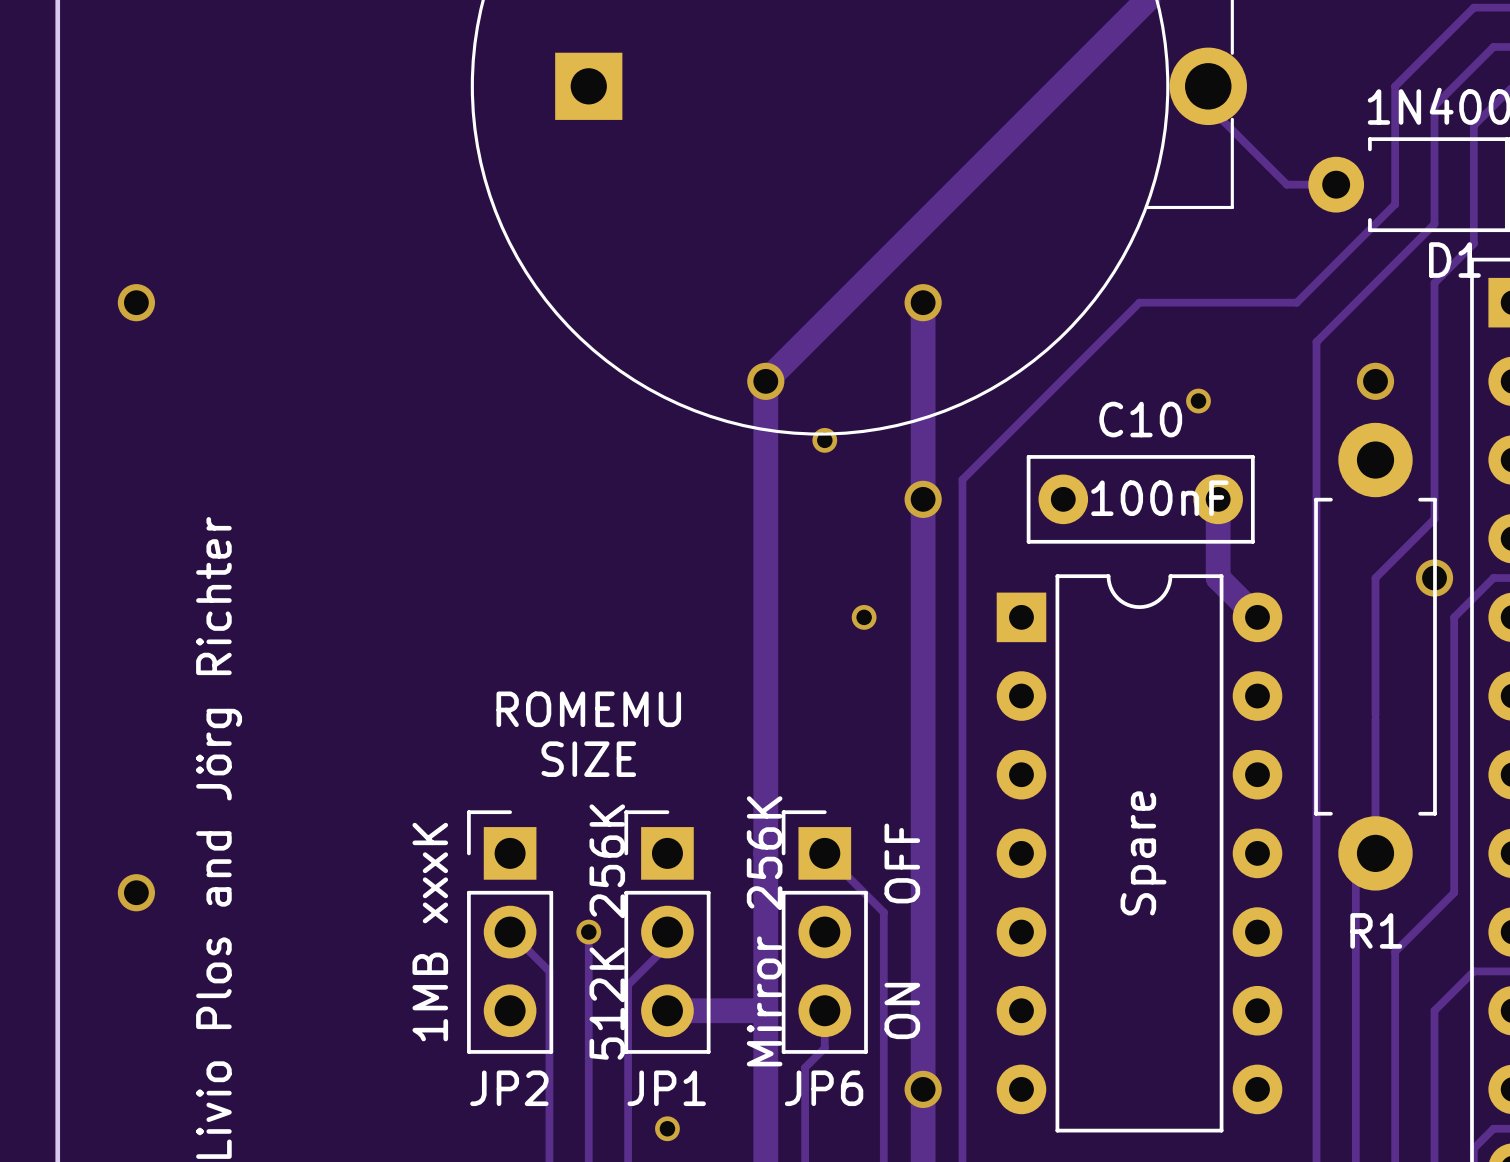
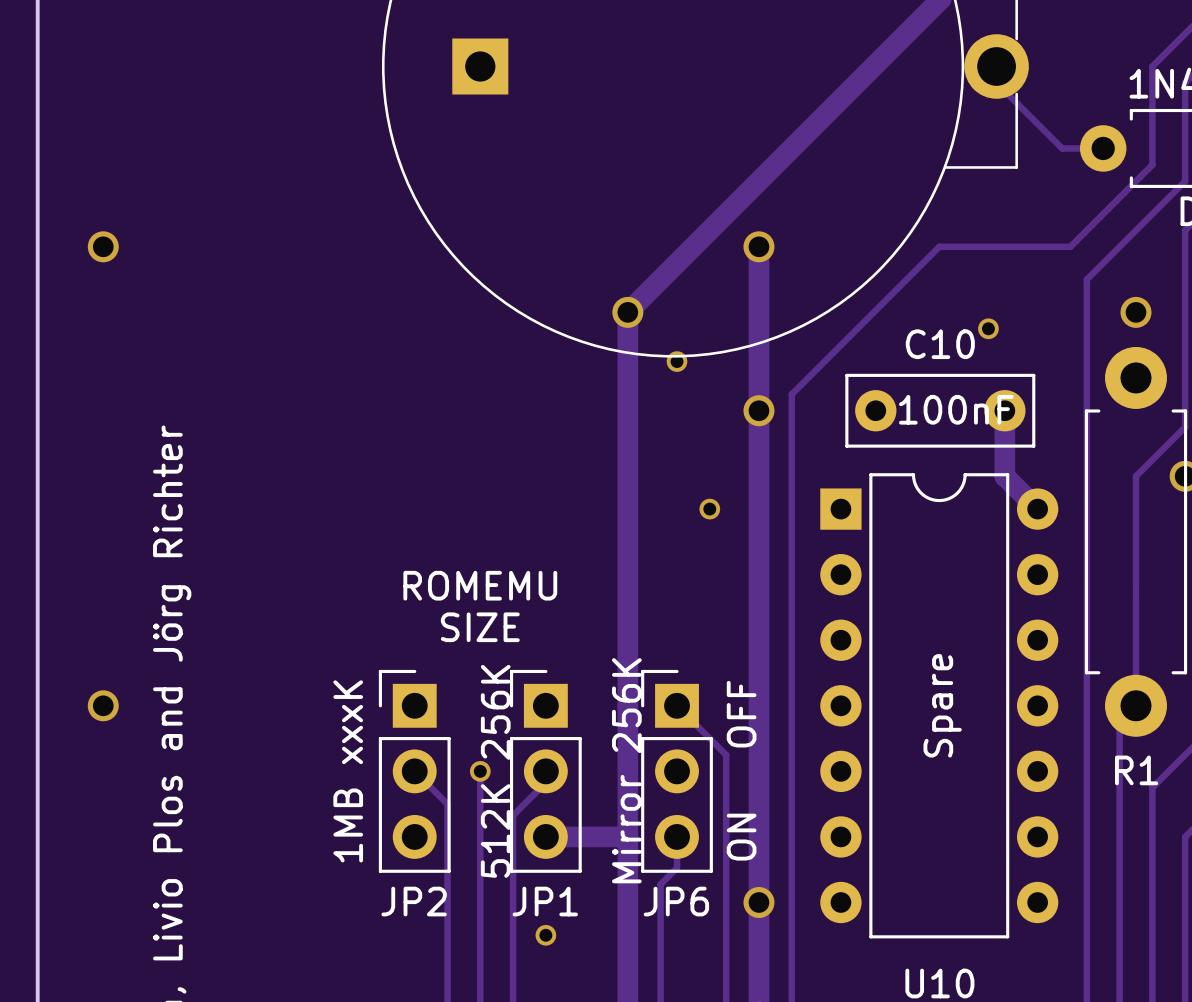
via position: (136, 892) -> (103, 705)

